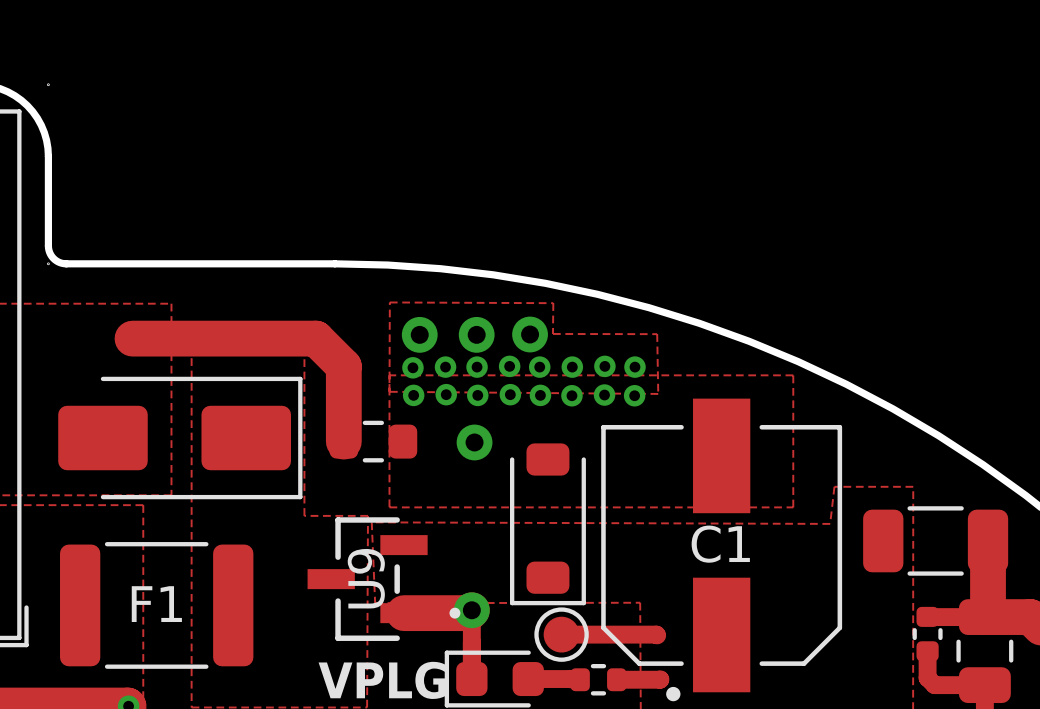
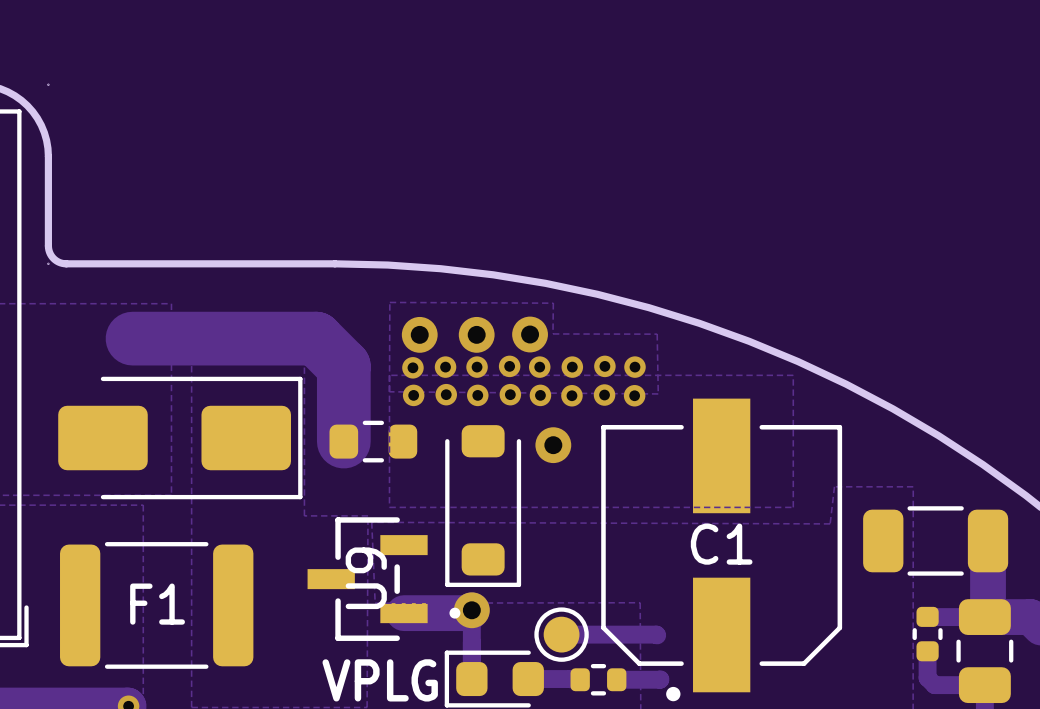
track width: thin (132, 338) (316, 338) (343, 366) (343, 441) -> thick (132, 338) (316, 338) (343, 366) (343, 441)
via position: (474, 442) -> (553, 445)
part position: (547, 524) -> (483, 506)

